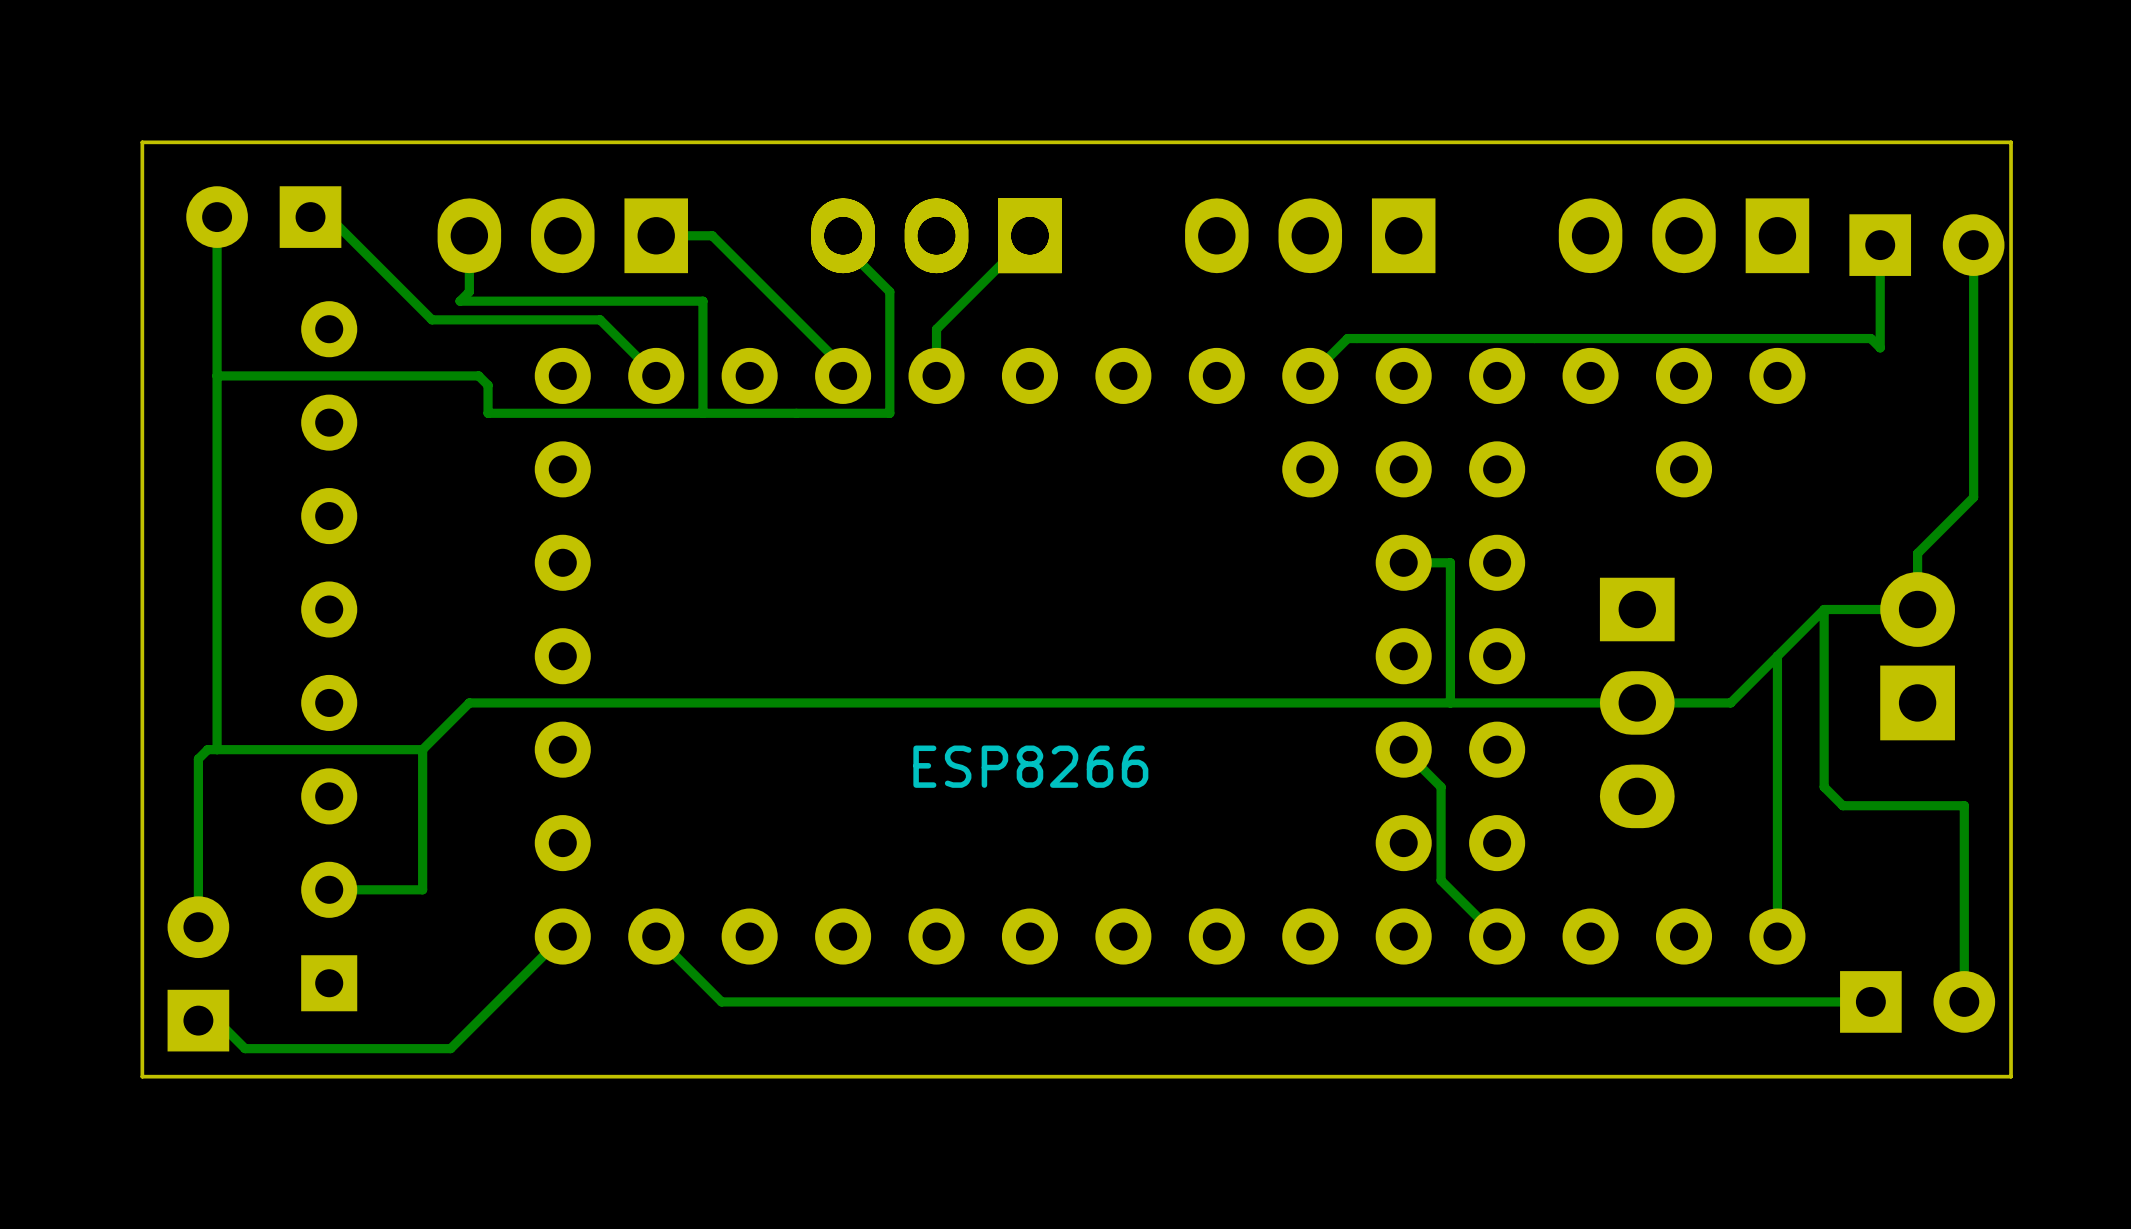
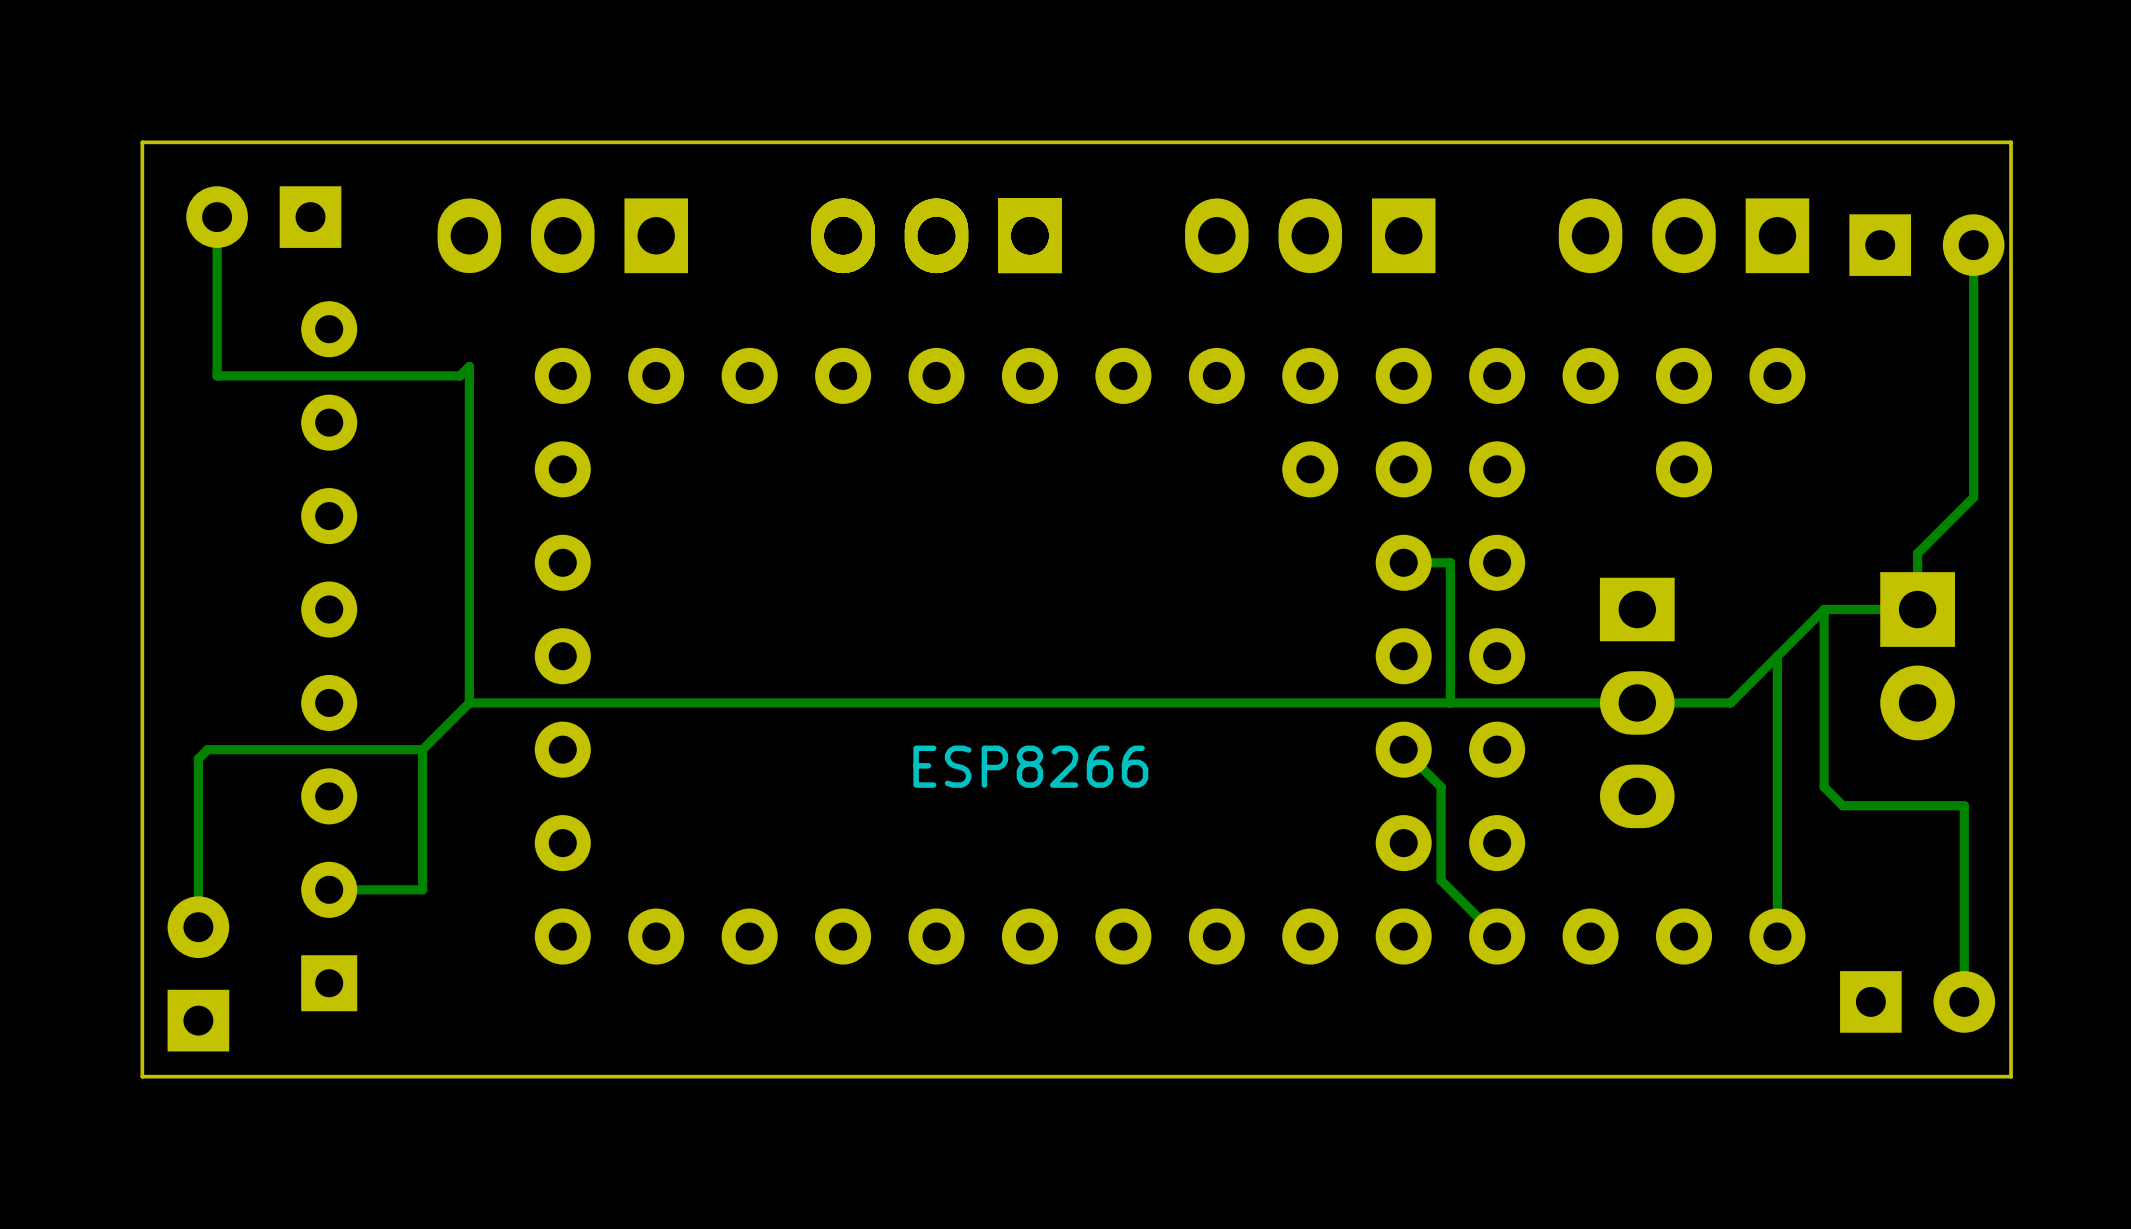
track: (310, 217) (329, 217) (431, 319) (600, 319) (656, 375) -> none
track: (469, 235) (469, 291) (460, 301) (702, 301) (702, 413) -> none
track: (656, 235) (712, 235) (843, 366) (843, 375) -> none
track: (843, 235) (843, 245) (889, 291) (889, 413) (488, 413) (488, 385) (478, 375) (460, 375) -> (469, 702) (469, 366) (460, 375)
track: (1029, 235) (936, 329) (936, 375) -> none
track: (1880, 245) (1880, 347) (1870, 338) (1347, 338) (1310, 375) -> none
track: (217, 375) (217, 749) -> none
part rotation: 0° (1917, 656) -> 180° (1917, 656)
track: (562, 936) (450, 1048) (245, 1048) (217, 1020) (198, 1020) -> none
track: (656, 936) (721, 1001) (1870, 1001) -> none

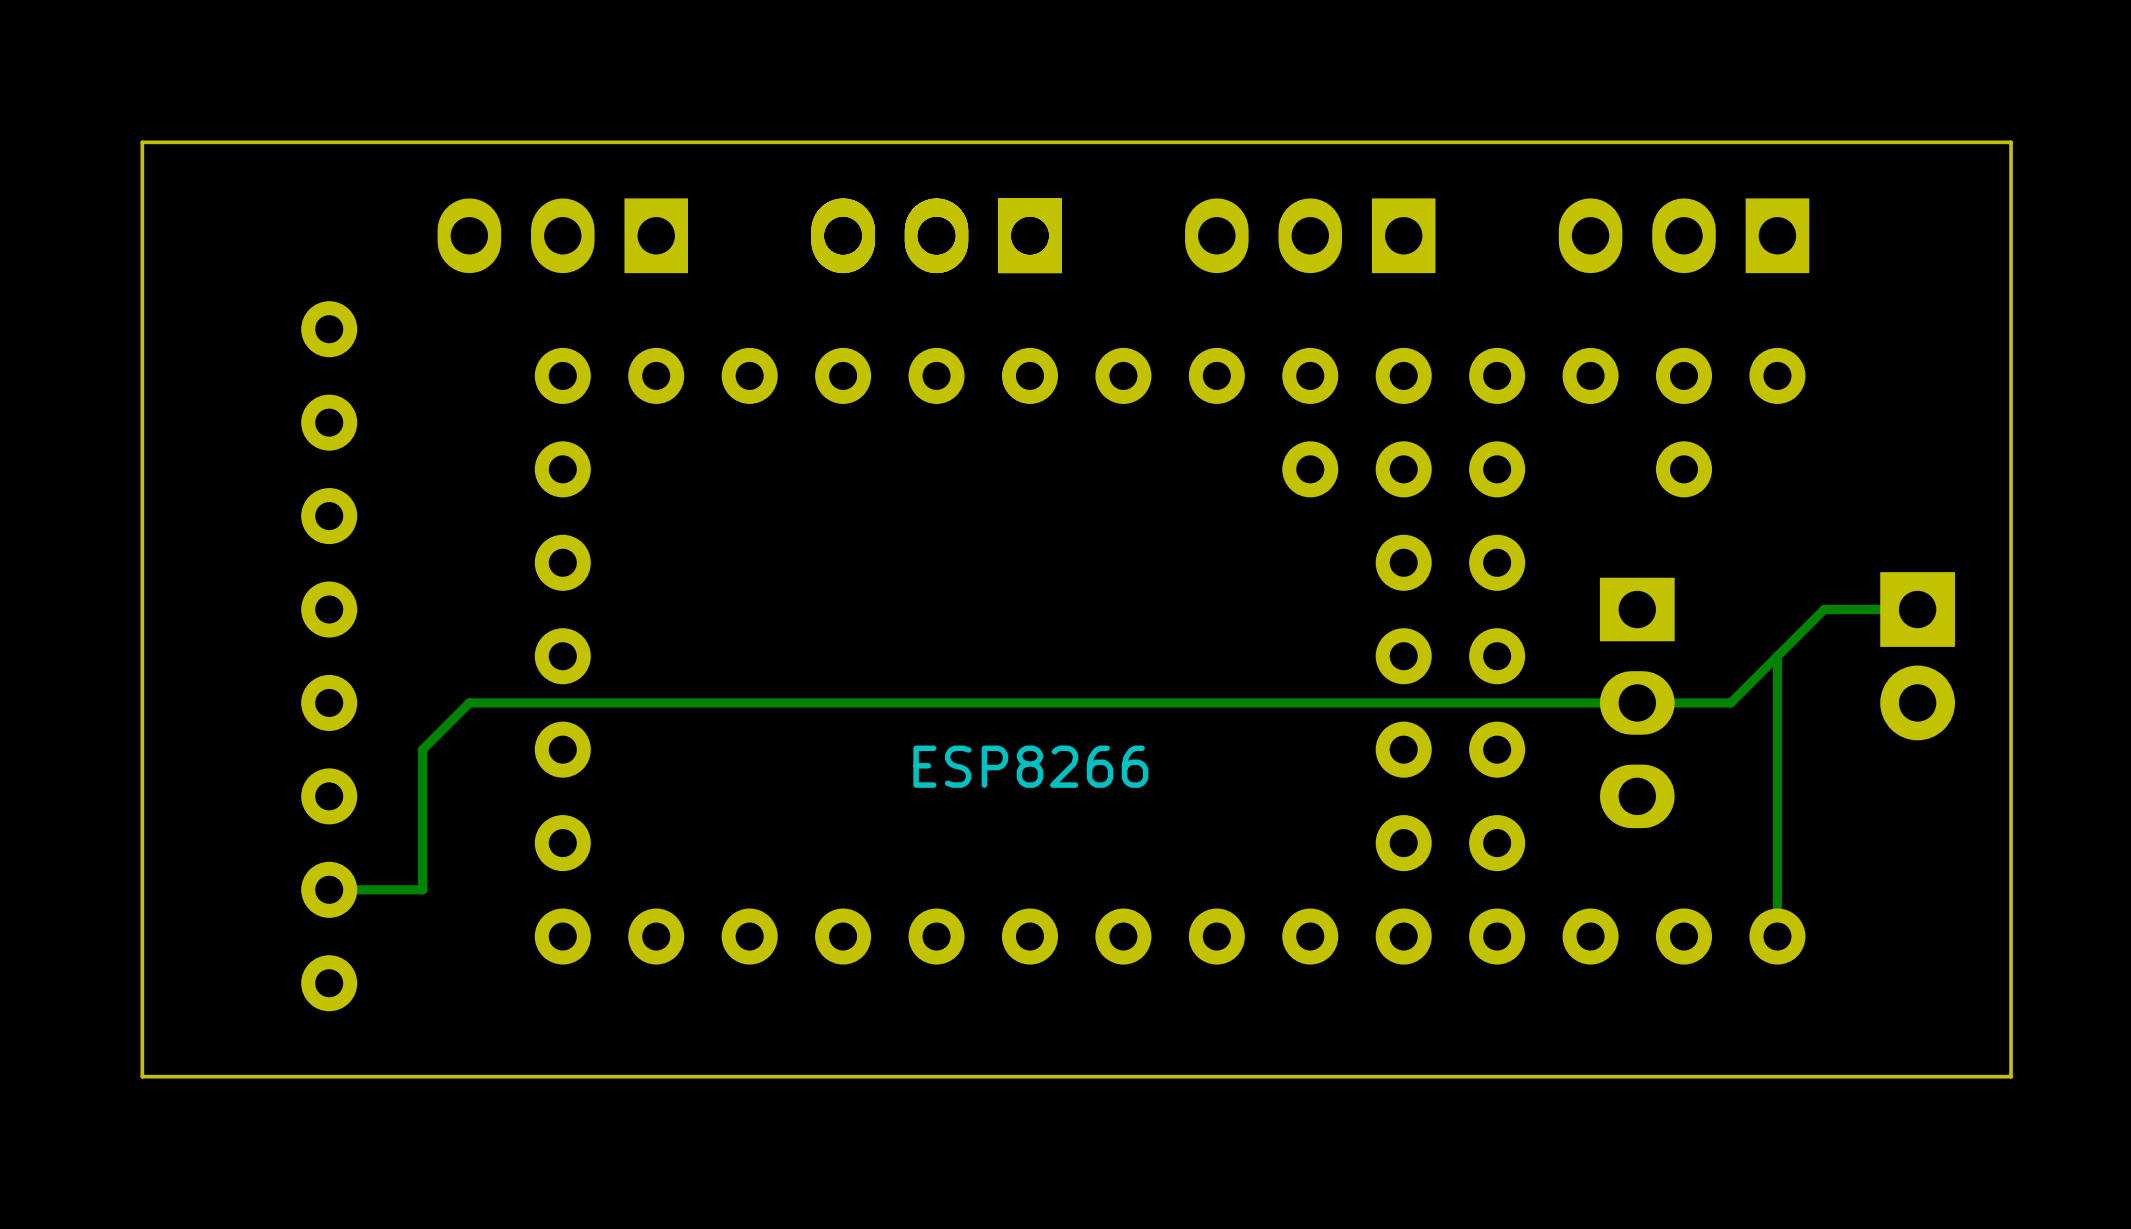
track: (217, 217) (217, 375) (460, 375) (469, 366) (469, 702) -> none
part: (263, 217) -> none
part: (1926, 245) -> none
track: (1973, 245) (1973, 497) (1917, 553) (1917, 609) -> none
part footprint: [301, 301, 358, 1012] -> [301, 301, 358, 1012]
track: (1403, 562) (1450, 562) (1450, 702) -> none
track: (1824, 609) (1824, 787) (1842, 805) (1964, 805) (1964, 1001) -> none
track: (422, 749) (207, 749) (198, 759) (198, 927) -> none
track: (1403, 749) (1441, 787) (1441, 880) (1497, 936) -> none
part: (198, 973) -> none
part: (1917, 1001) -> none

